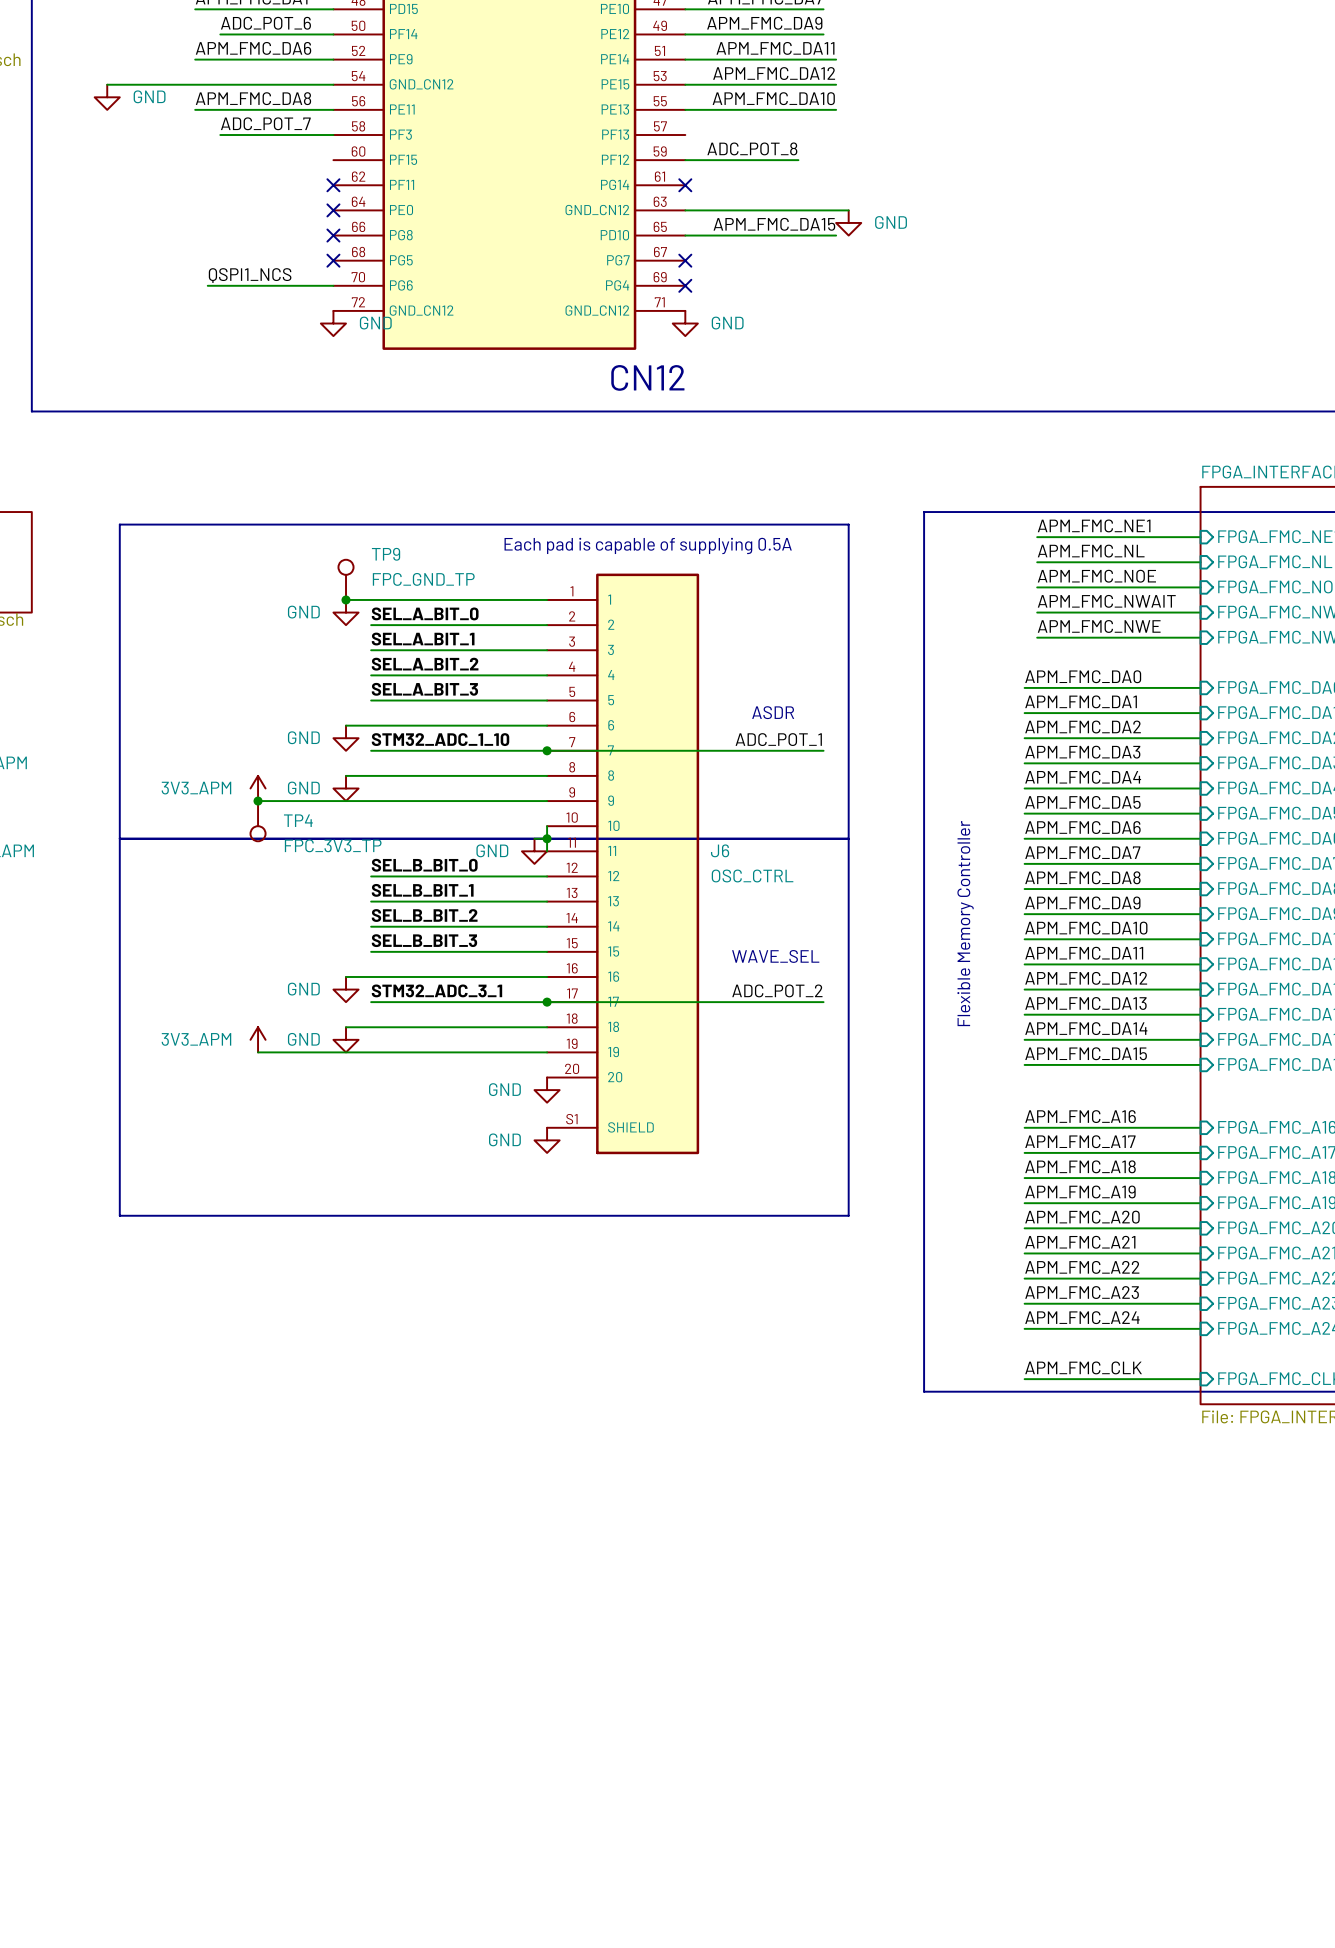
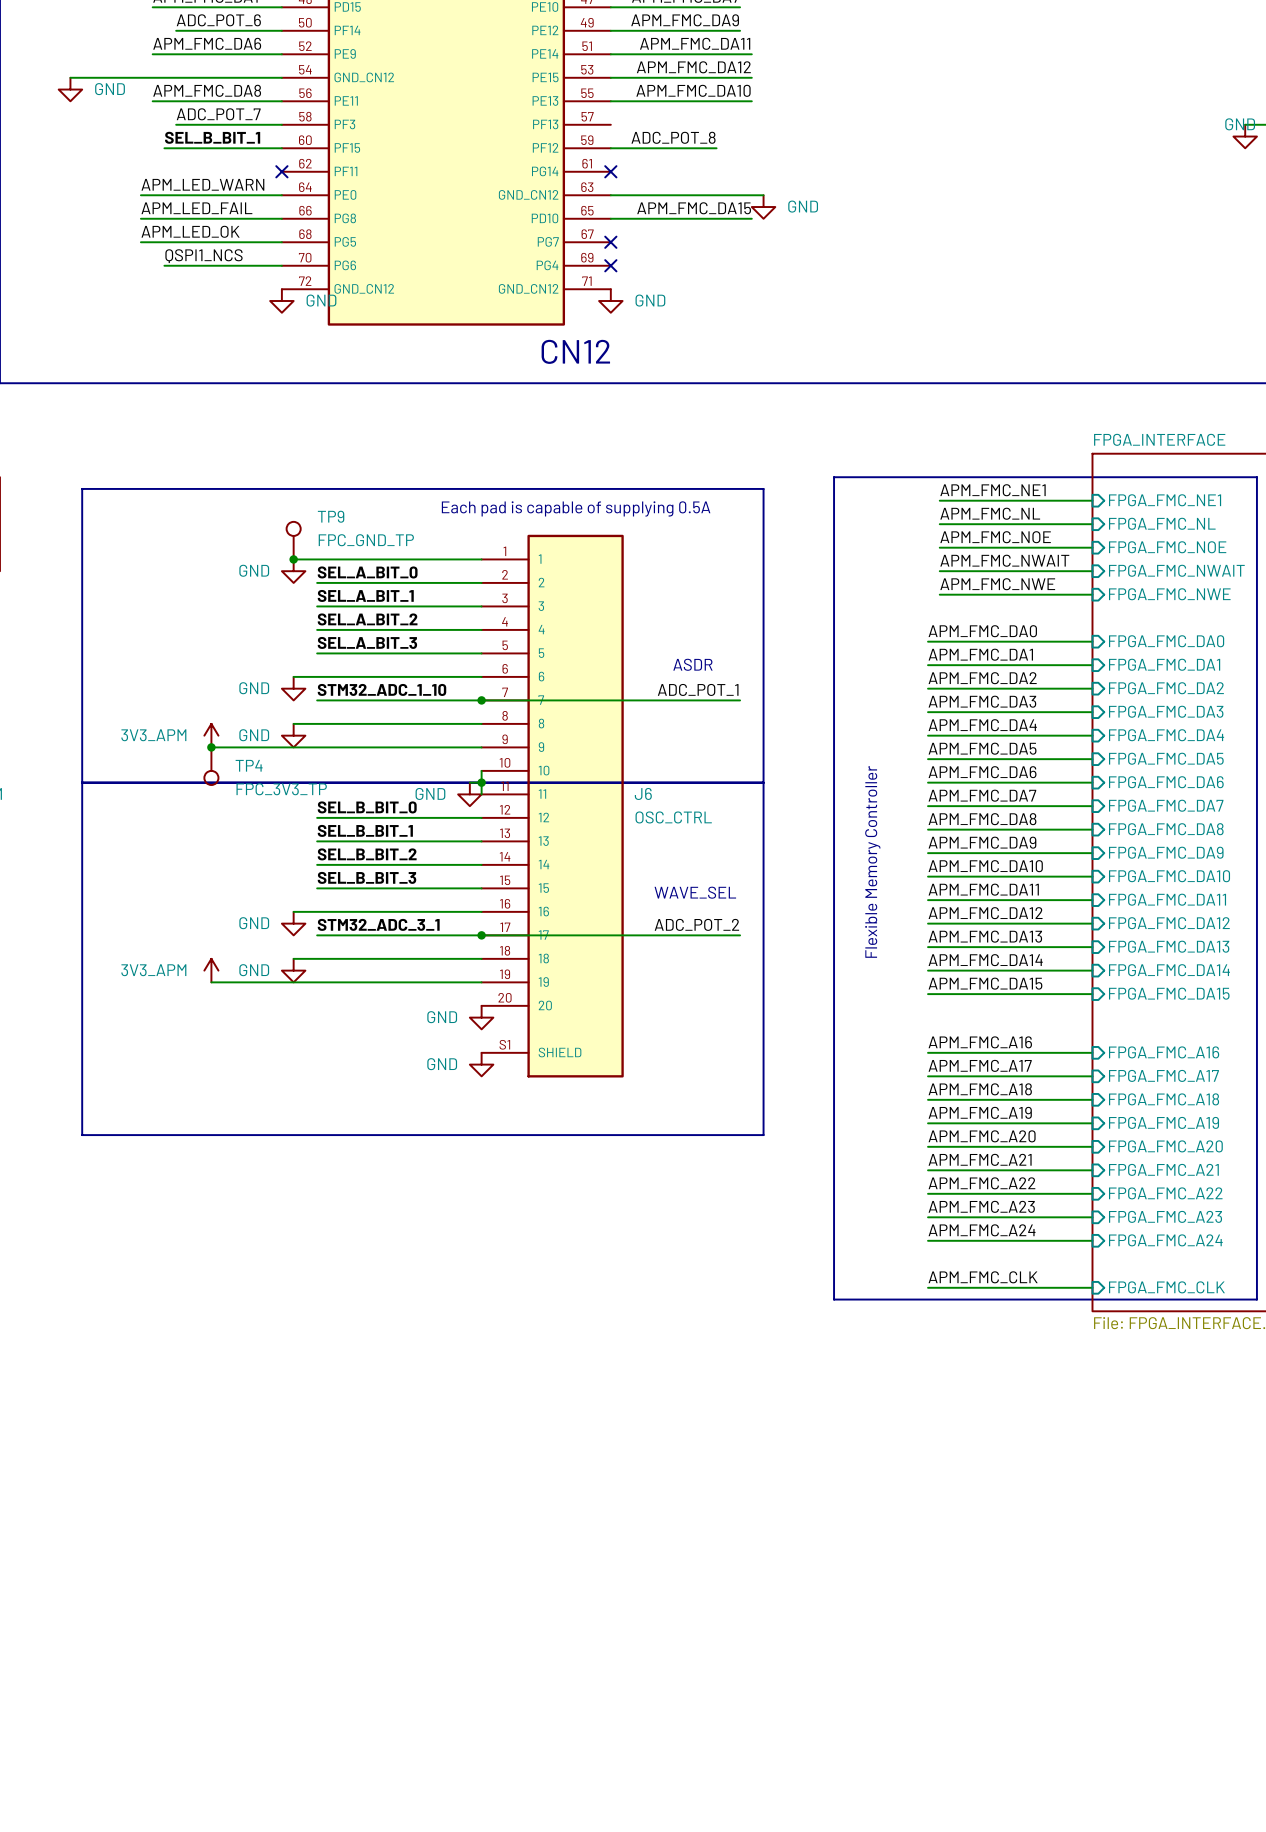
label: none -> SEL_B_BIT_1 (212, 137)
wire: none -> (164, 148) (281, 148)
label: none -> APM_LED_WARN (202, 184)
wire: none -> (140, 195) (281, 195)
no-connect mark: (333, 210) -> none
label: none -> APM_LED_FAIL (196, 208)
wire: none -> (140, 218) (281, 218)
no-connect mark: (333, 235) -> none
label: none -> APM_LED_OK (190, 231)
wire: none -> (140, 242) (281, 242)
no-connect mark: (333, 260) -> none

